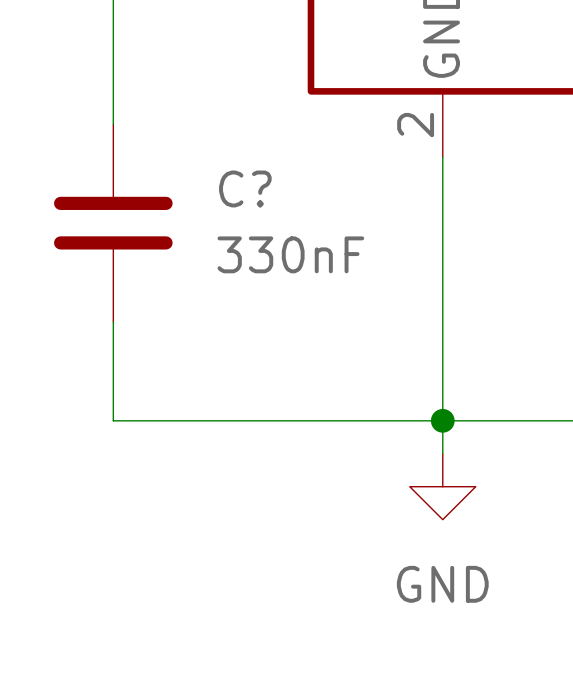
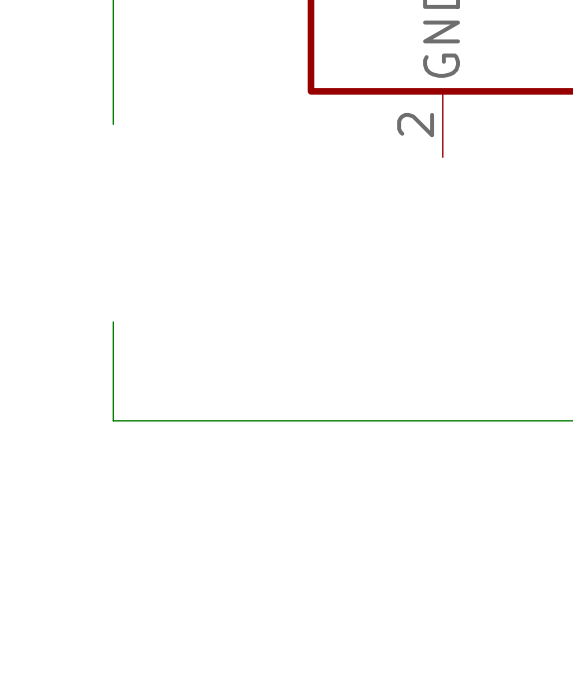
wire: (442, 157) (442, 453) -> none
C?: 330nF (113, 223) -> none
junction: (442, 420) -> none
power symbol: GND (442, 486) -> none

